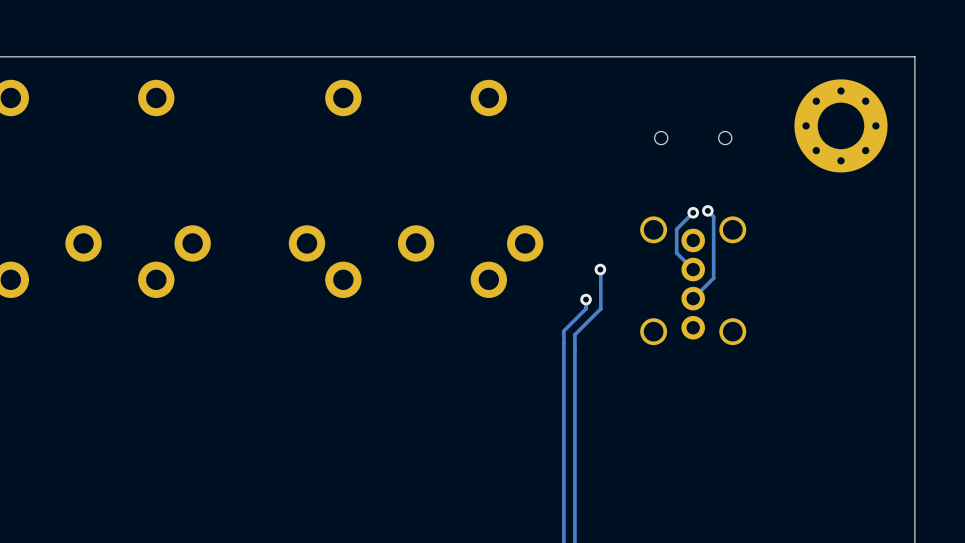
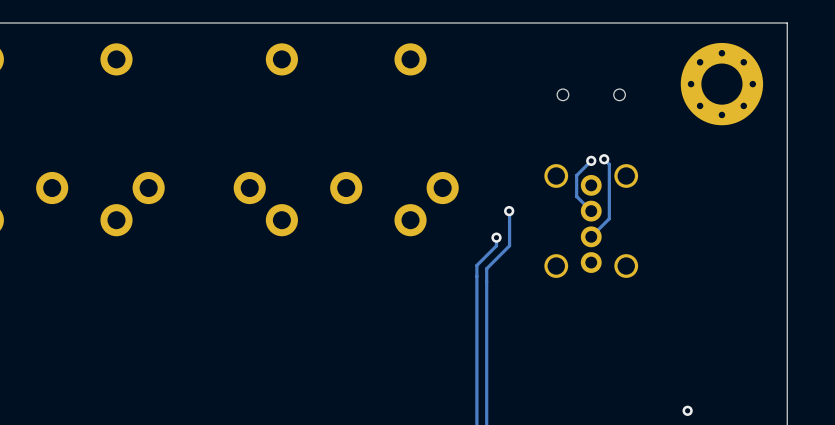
via: none -> (687, 410)

